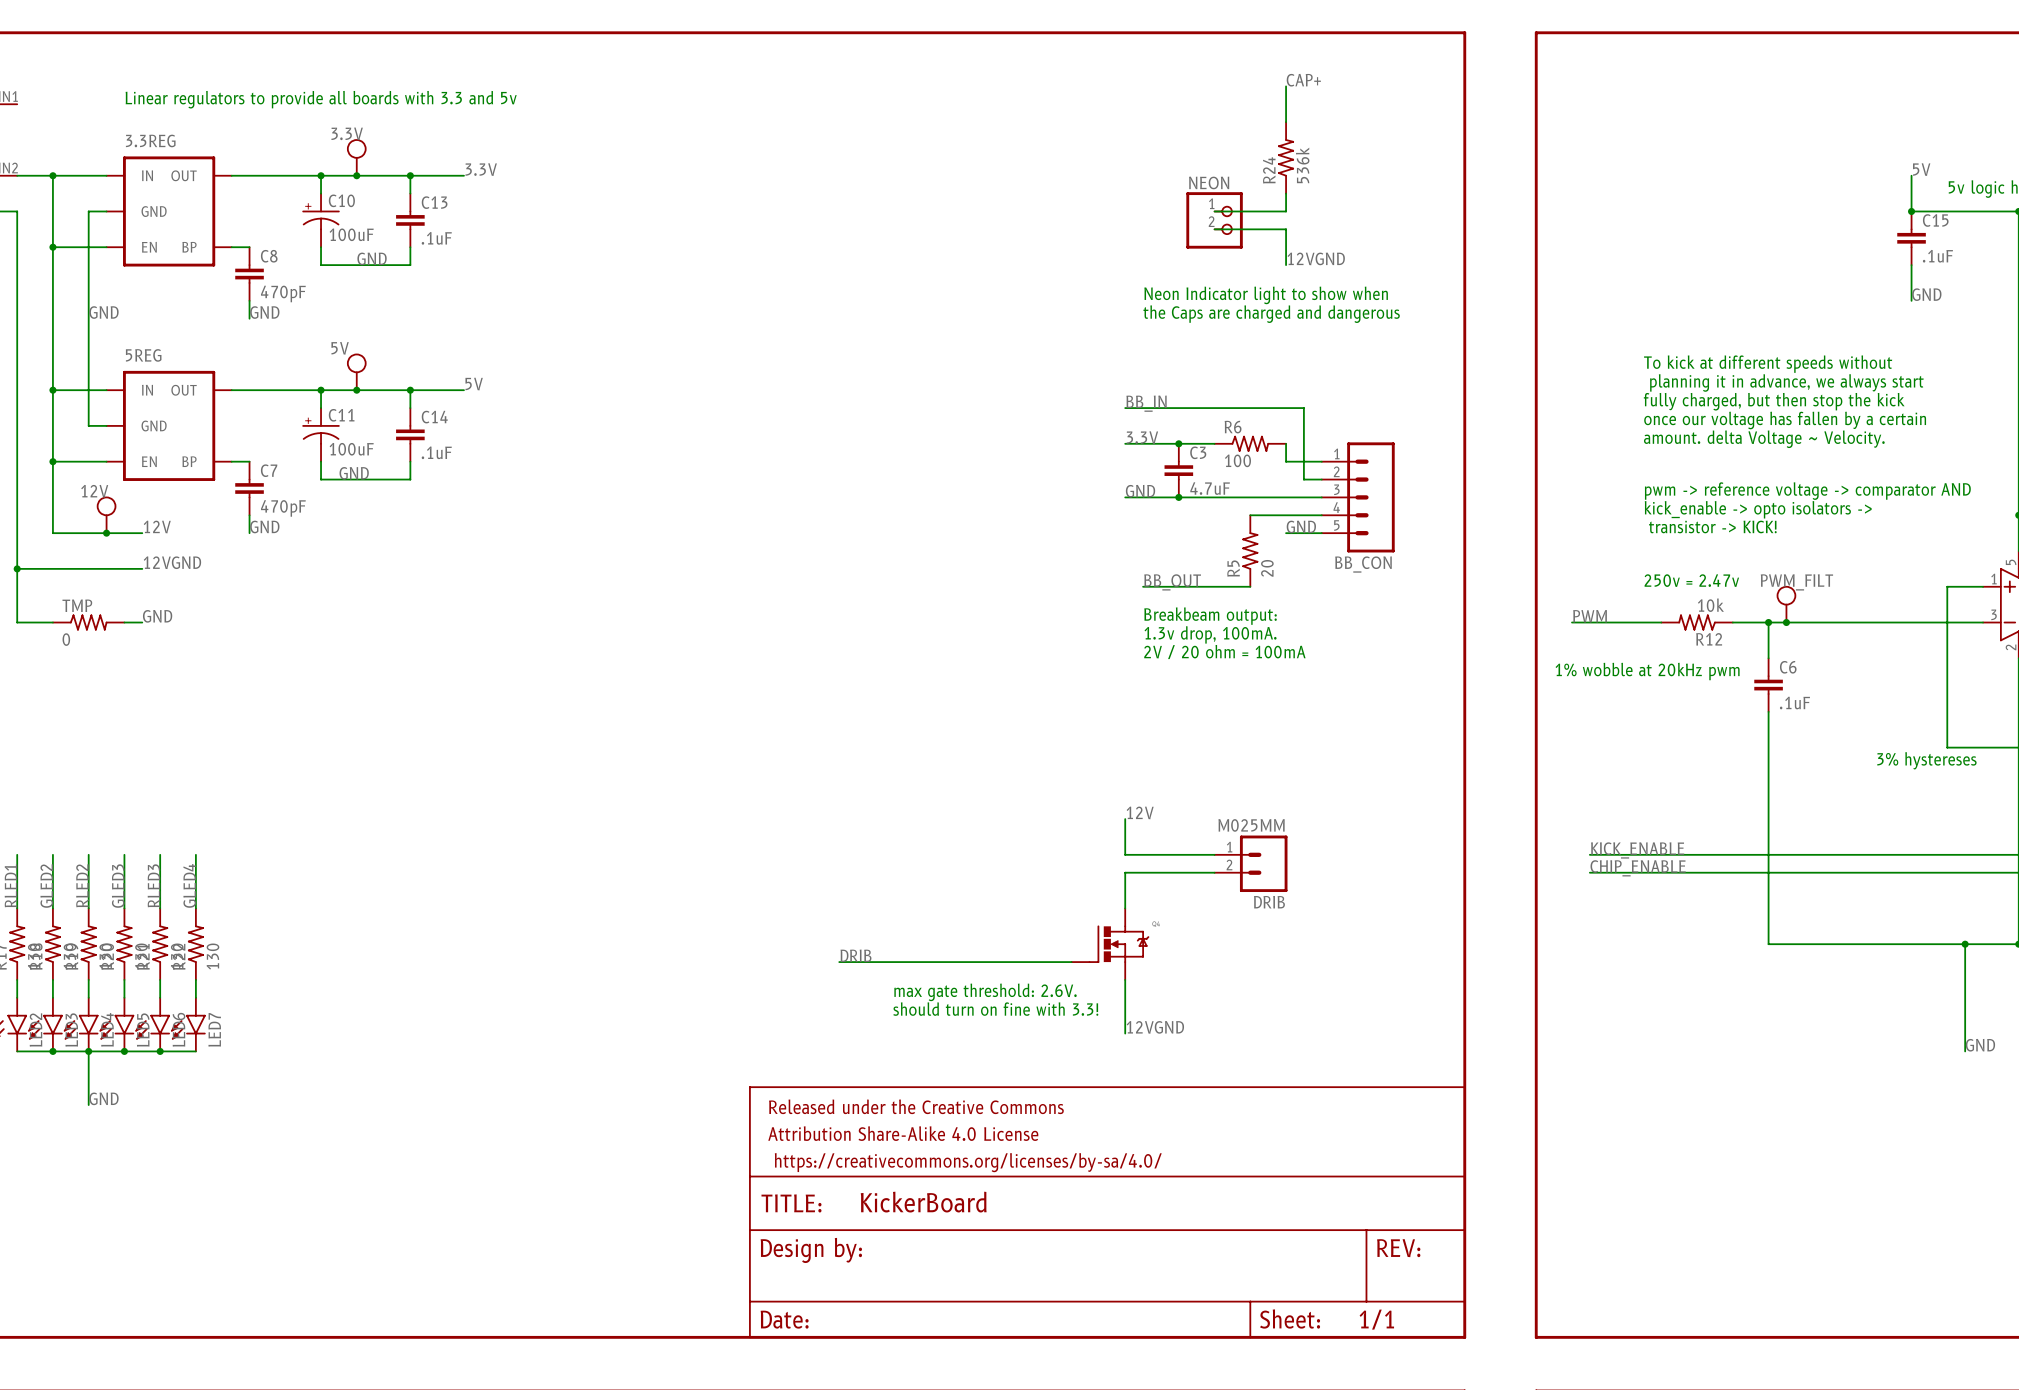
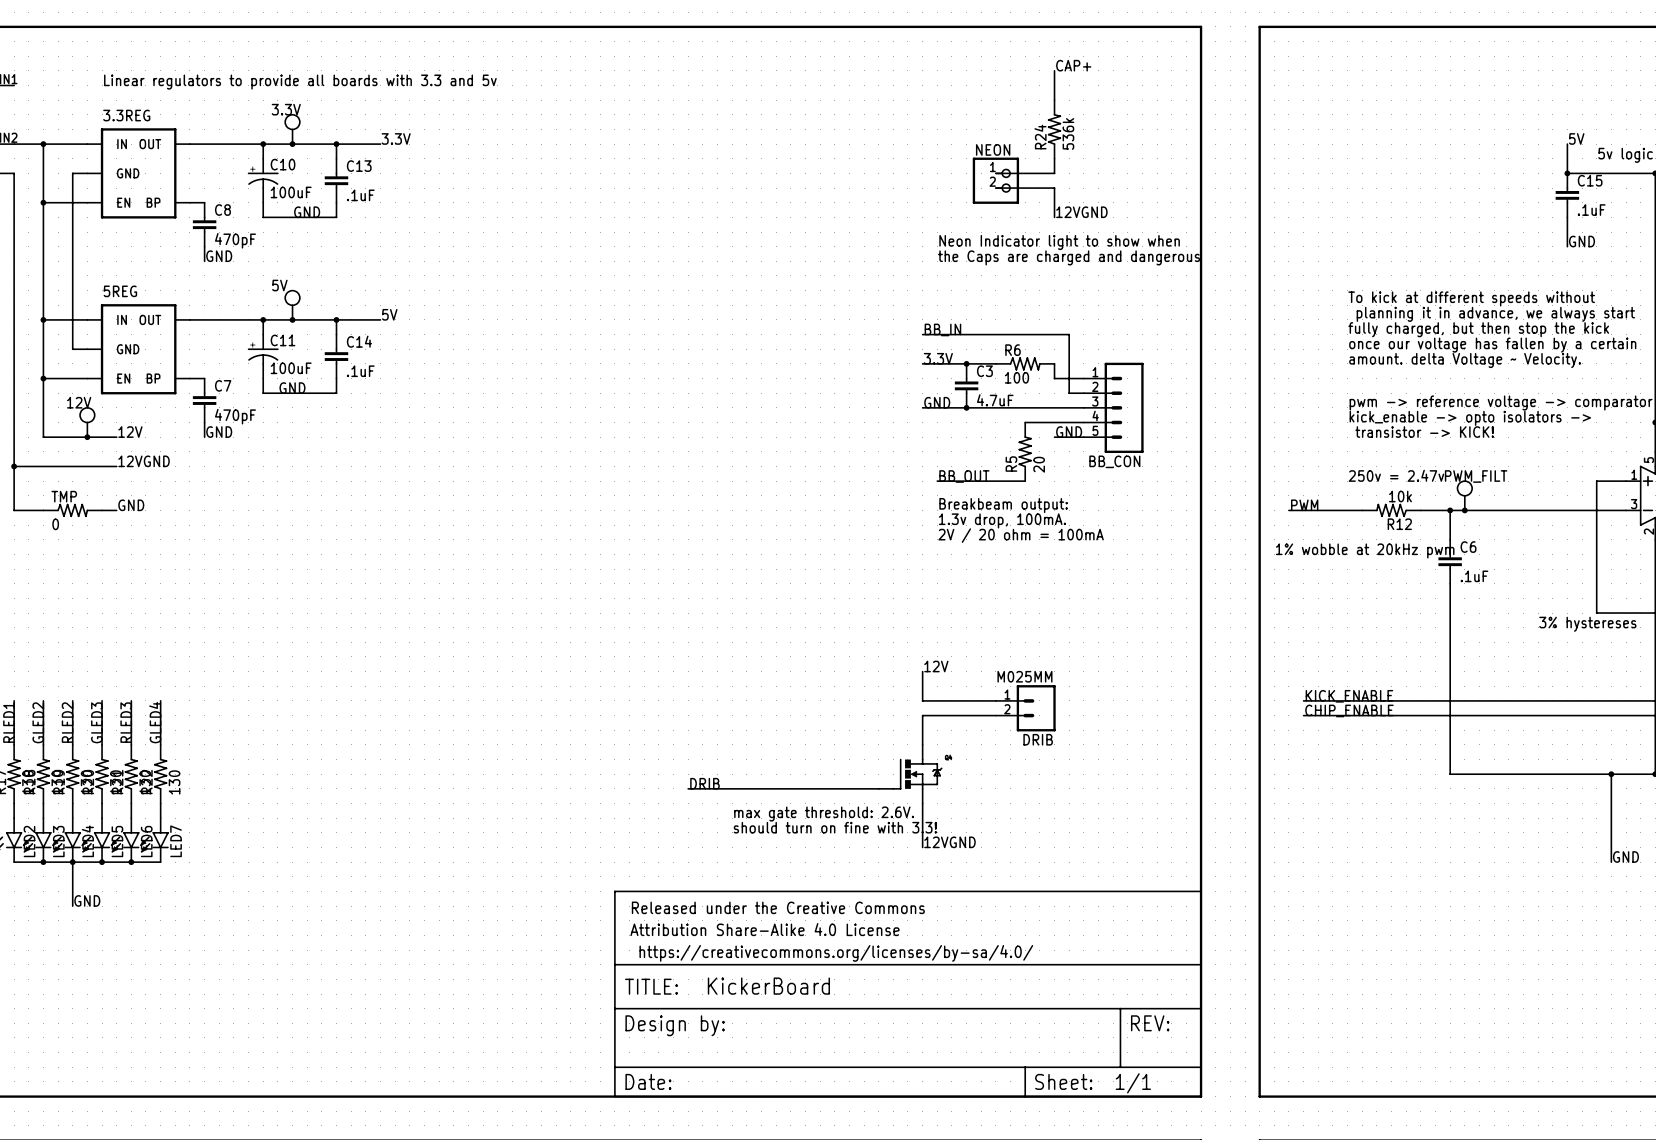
label: GND (103, 312) -> none

